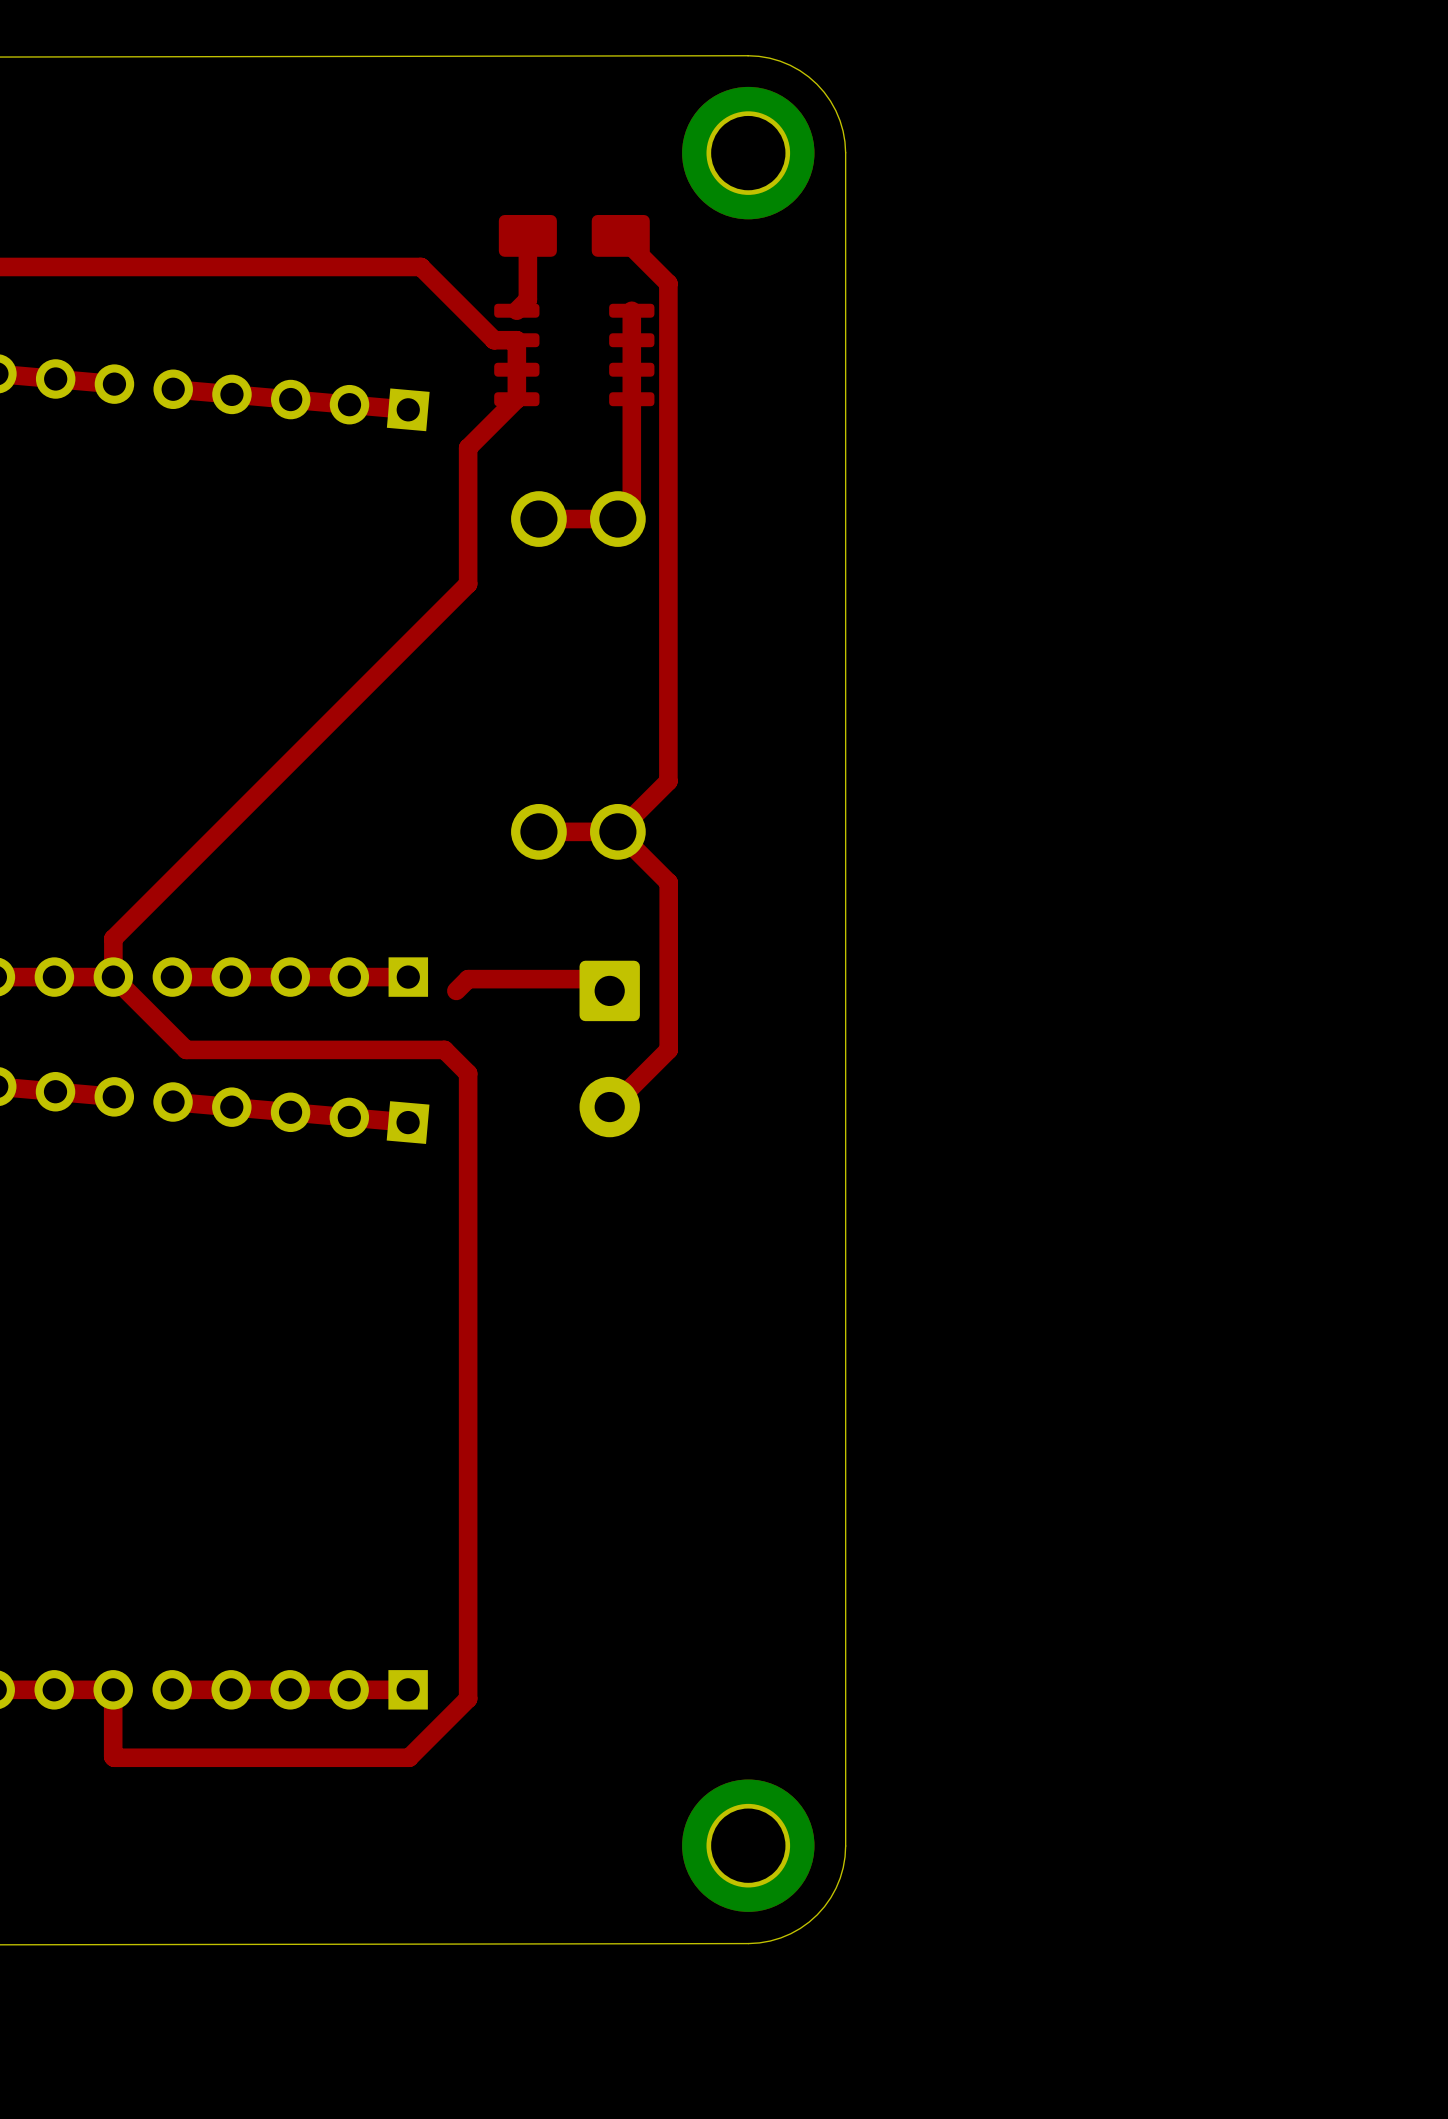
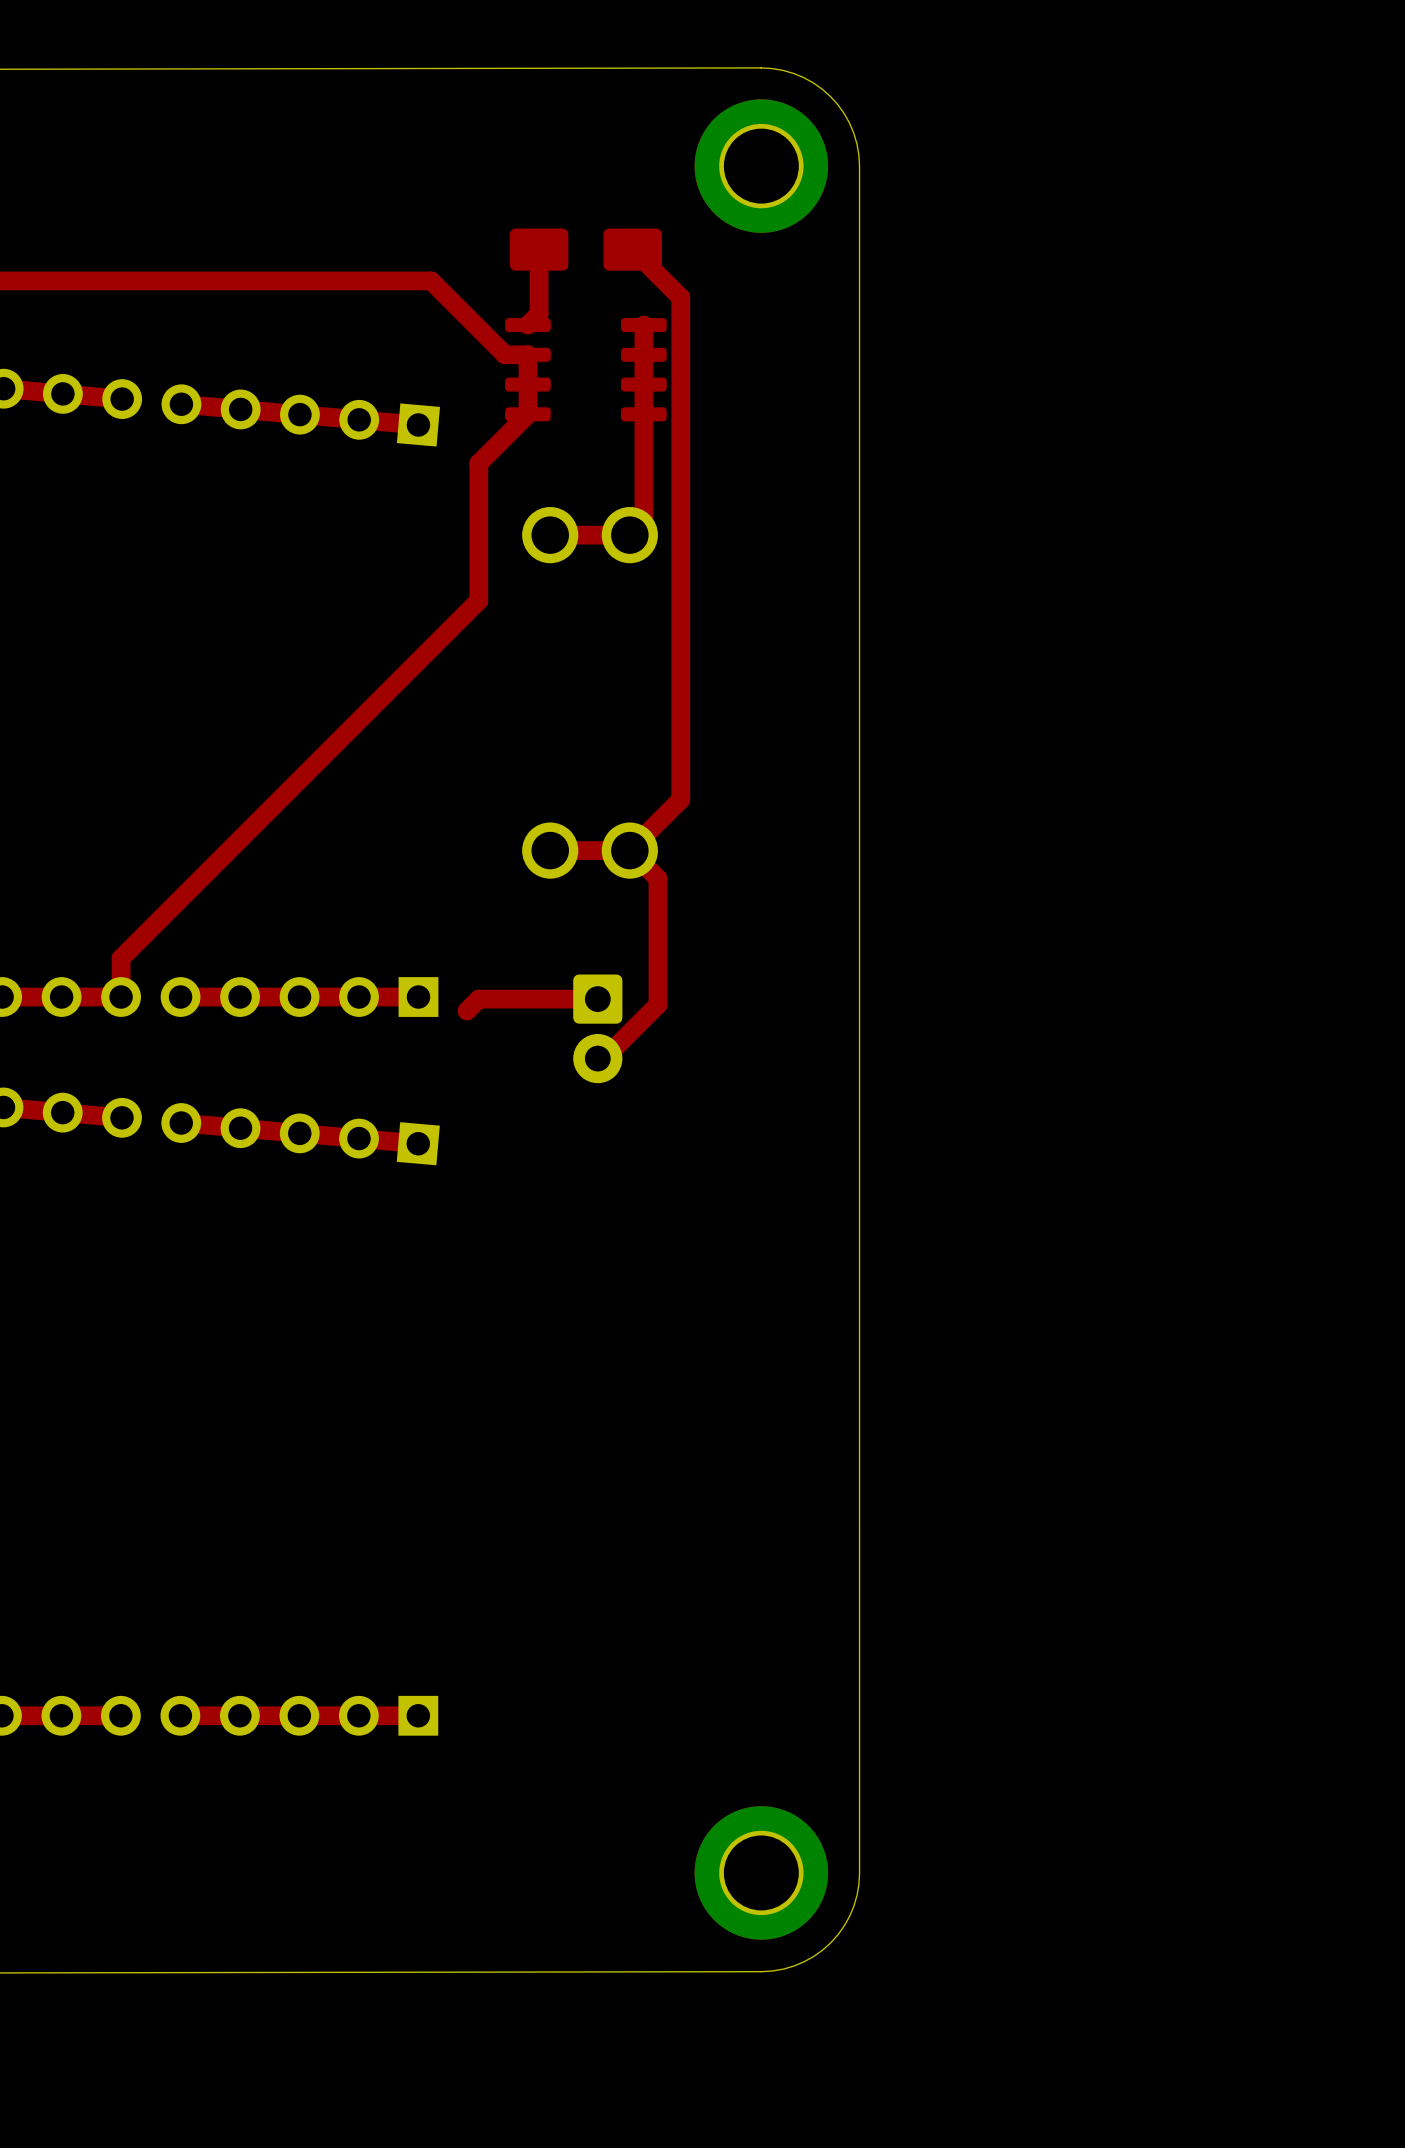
top track: (645, 859) (668, 882) (668, 1049) (609, 1107) -> (657, 878) (657, 1004) (604, 1058) (597, 1058)
top track: (113, 977) (186, 1049) (444, 1049) (468, 1073) (468, 1698) (409, 1757) (114, 1757) (113, 1689) -> none
part: none -> (597, 1028)
part: (609, 1048) -> none

